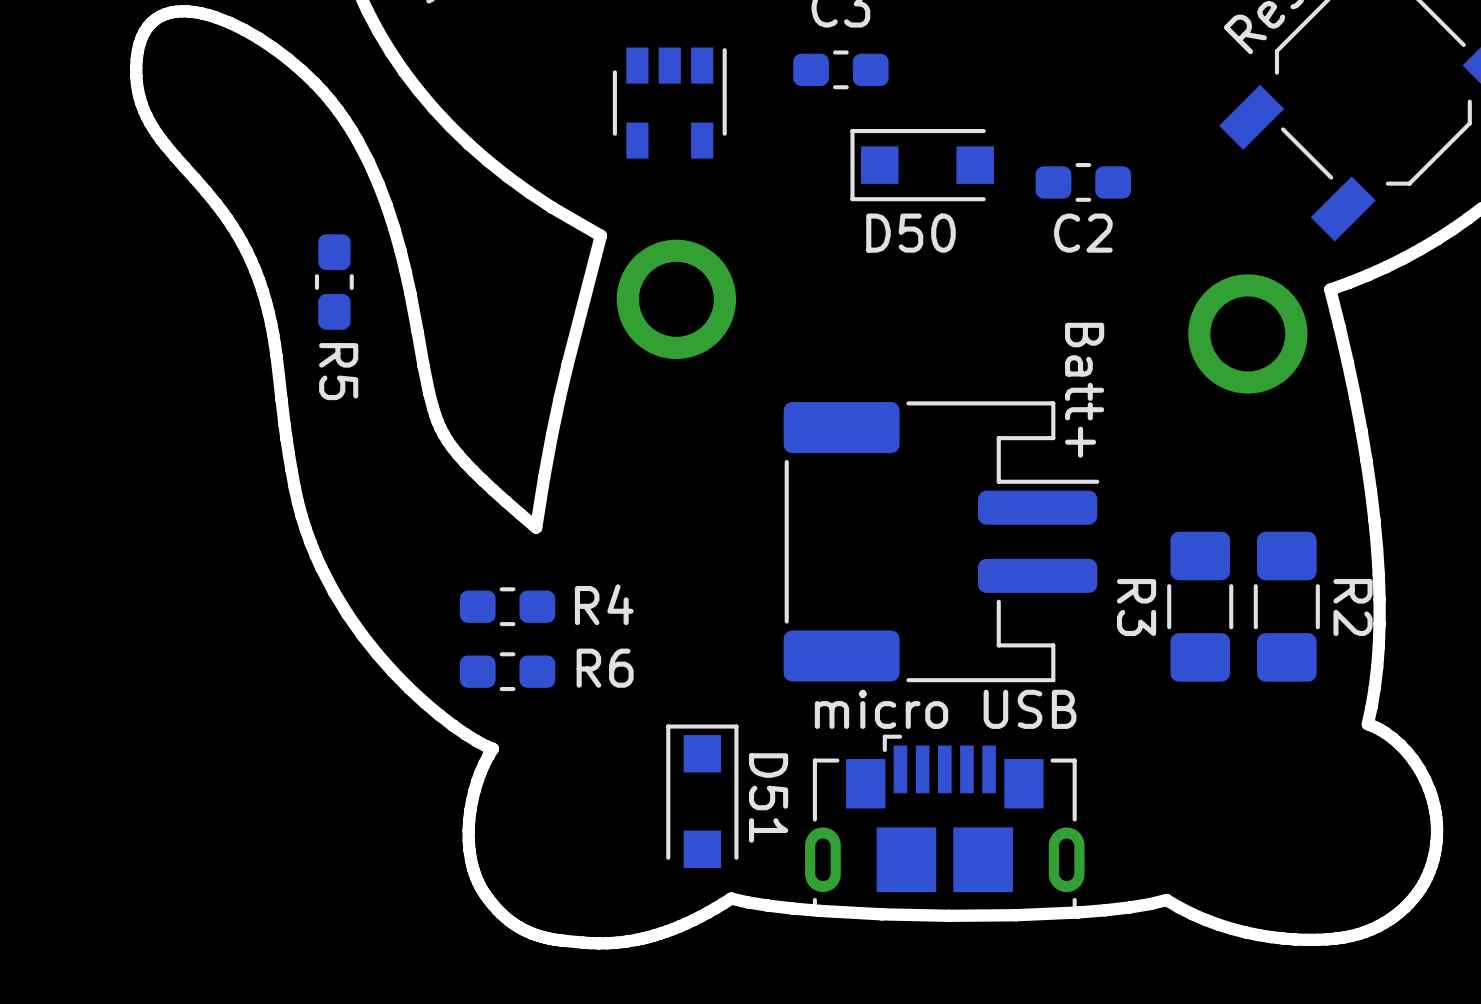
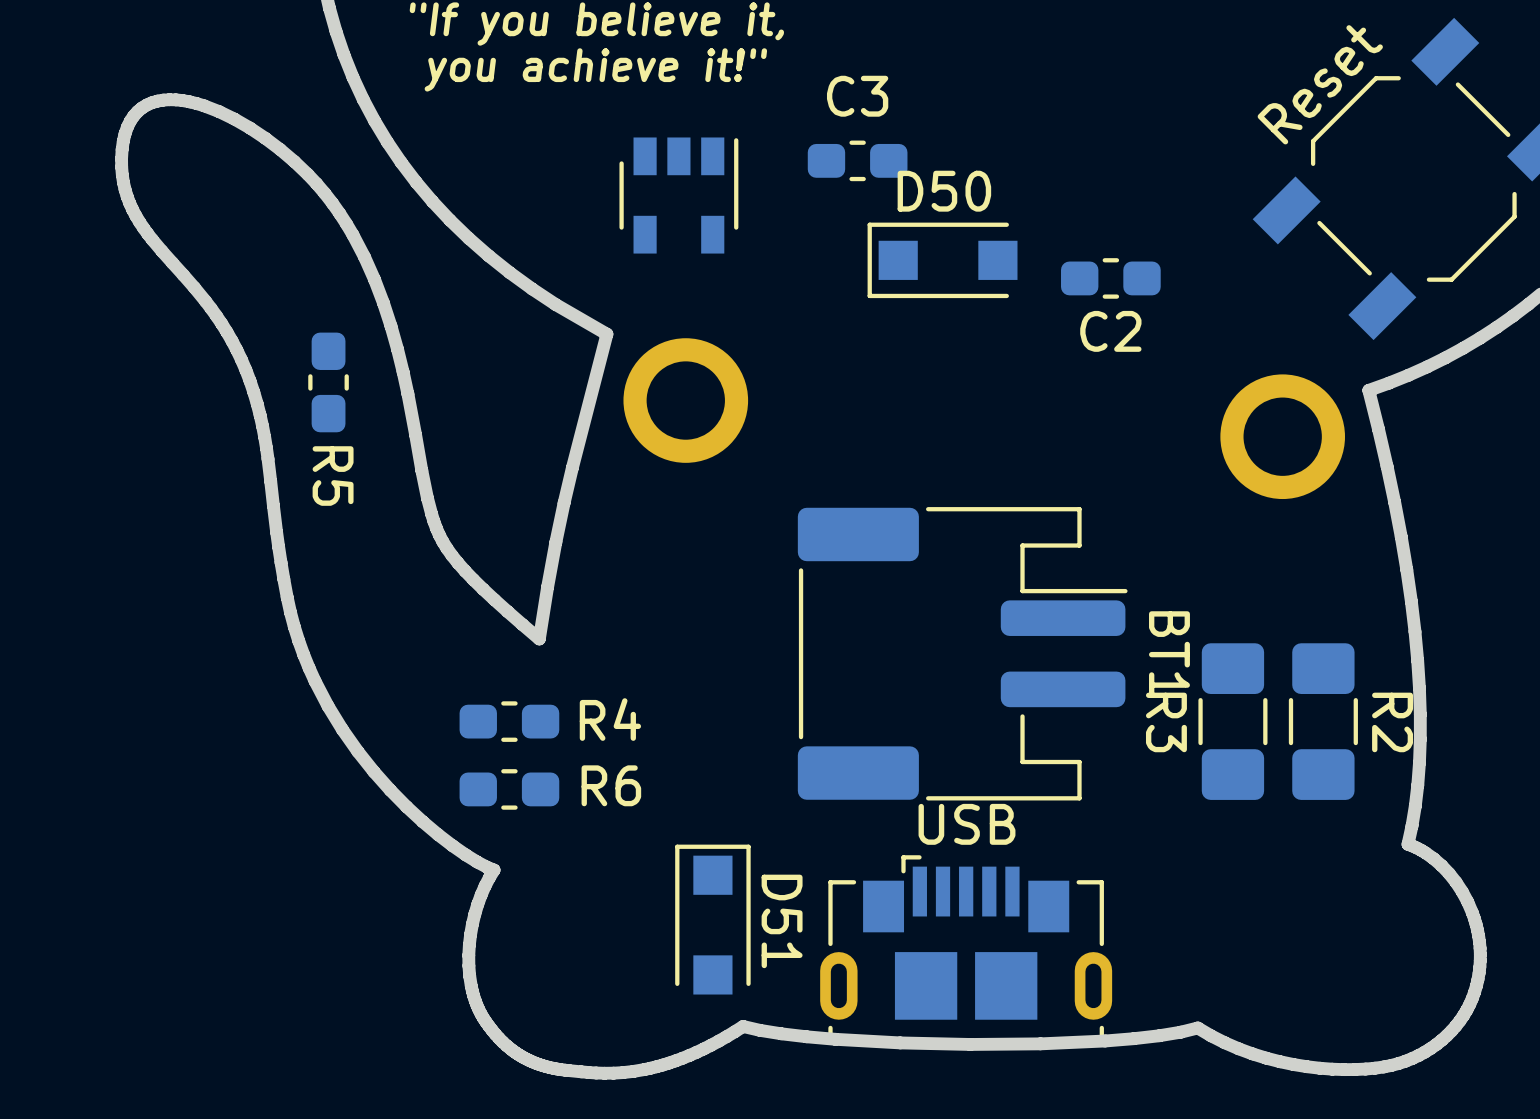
D50 name position: D50 (910, 233) -> D50 (944, 191)
Batt+ name: Batt+ (1084, 390) -> BT1 (1169, 654)
micro USB name: micro USB (945, 709) -> USB (967, 824)

